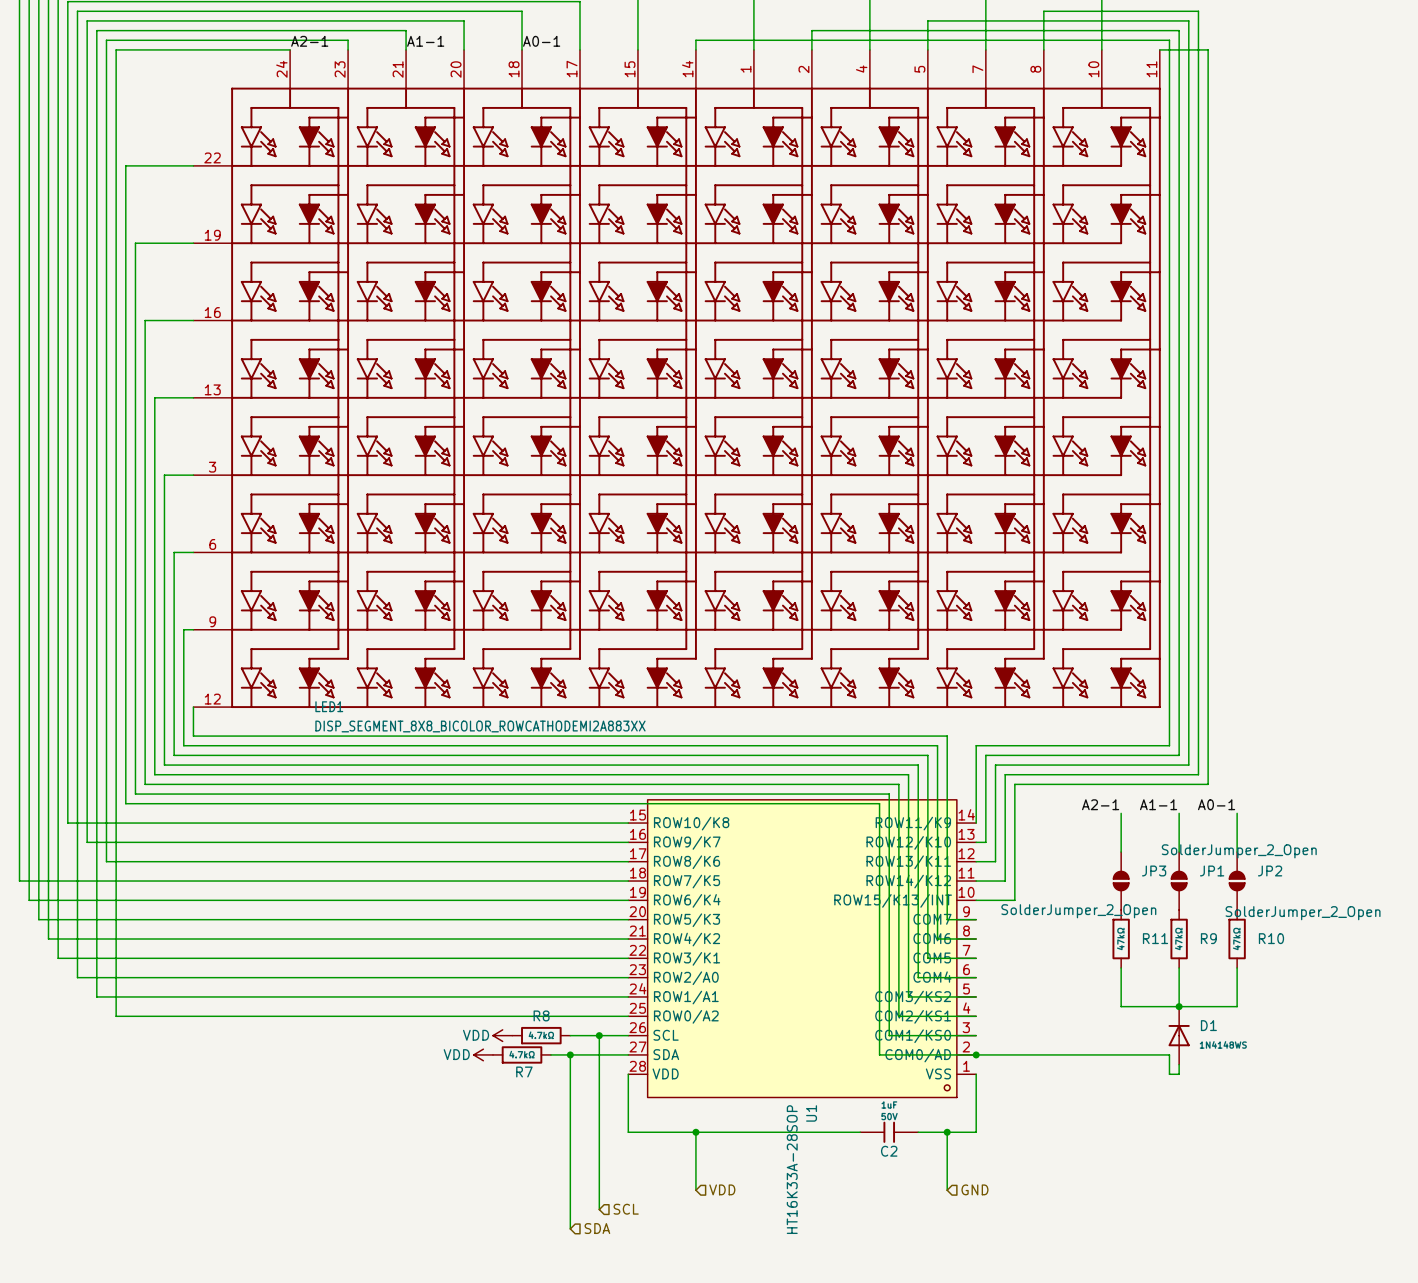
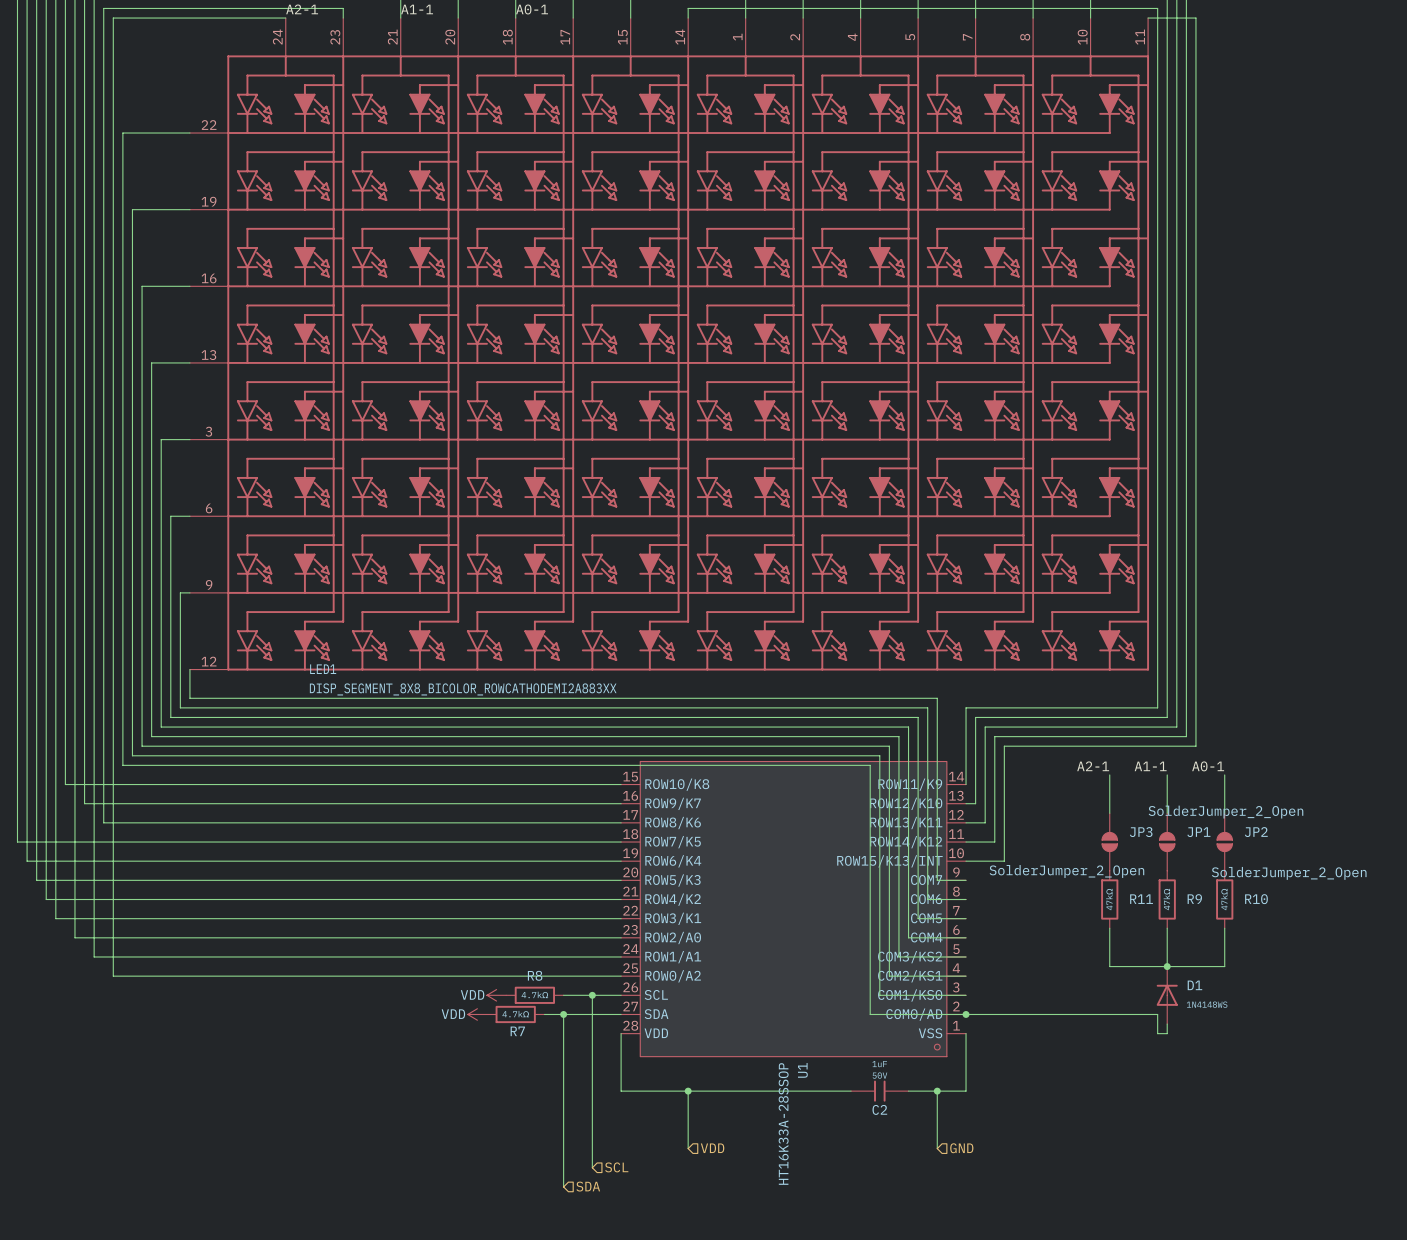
U1 value: HT16K33A-28SOP (792, 1169) -> HT16K33A-28SSOP (783, 1123)

